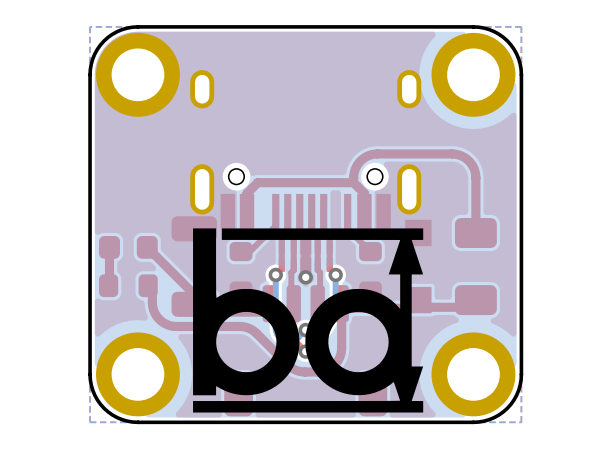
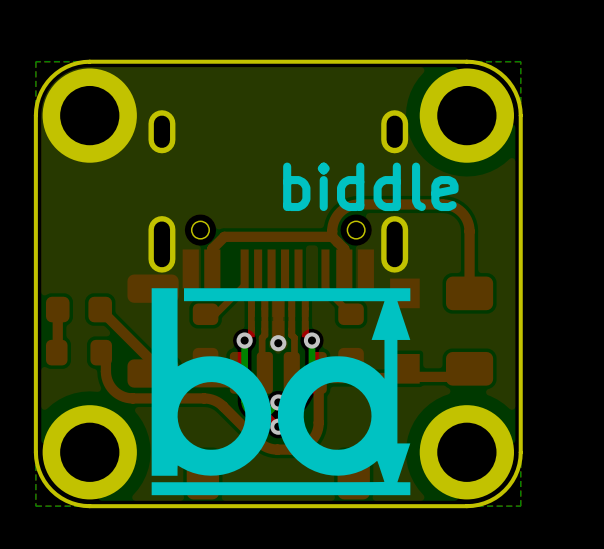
text: none -> biddle (370, 186)

